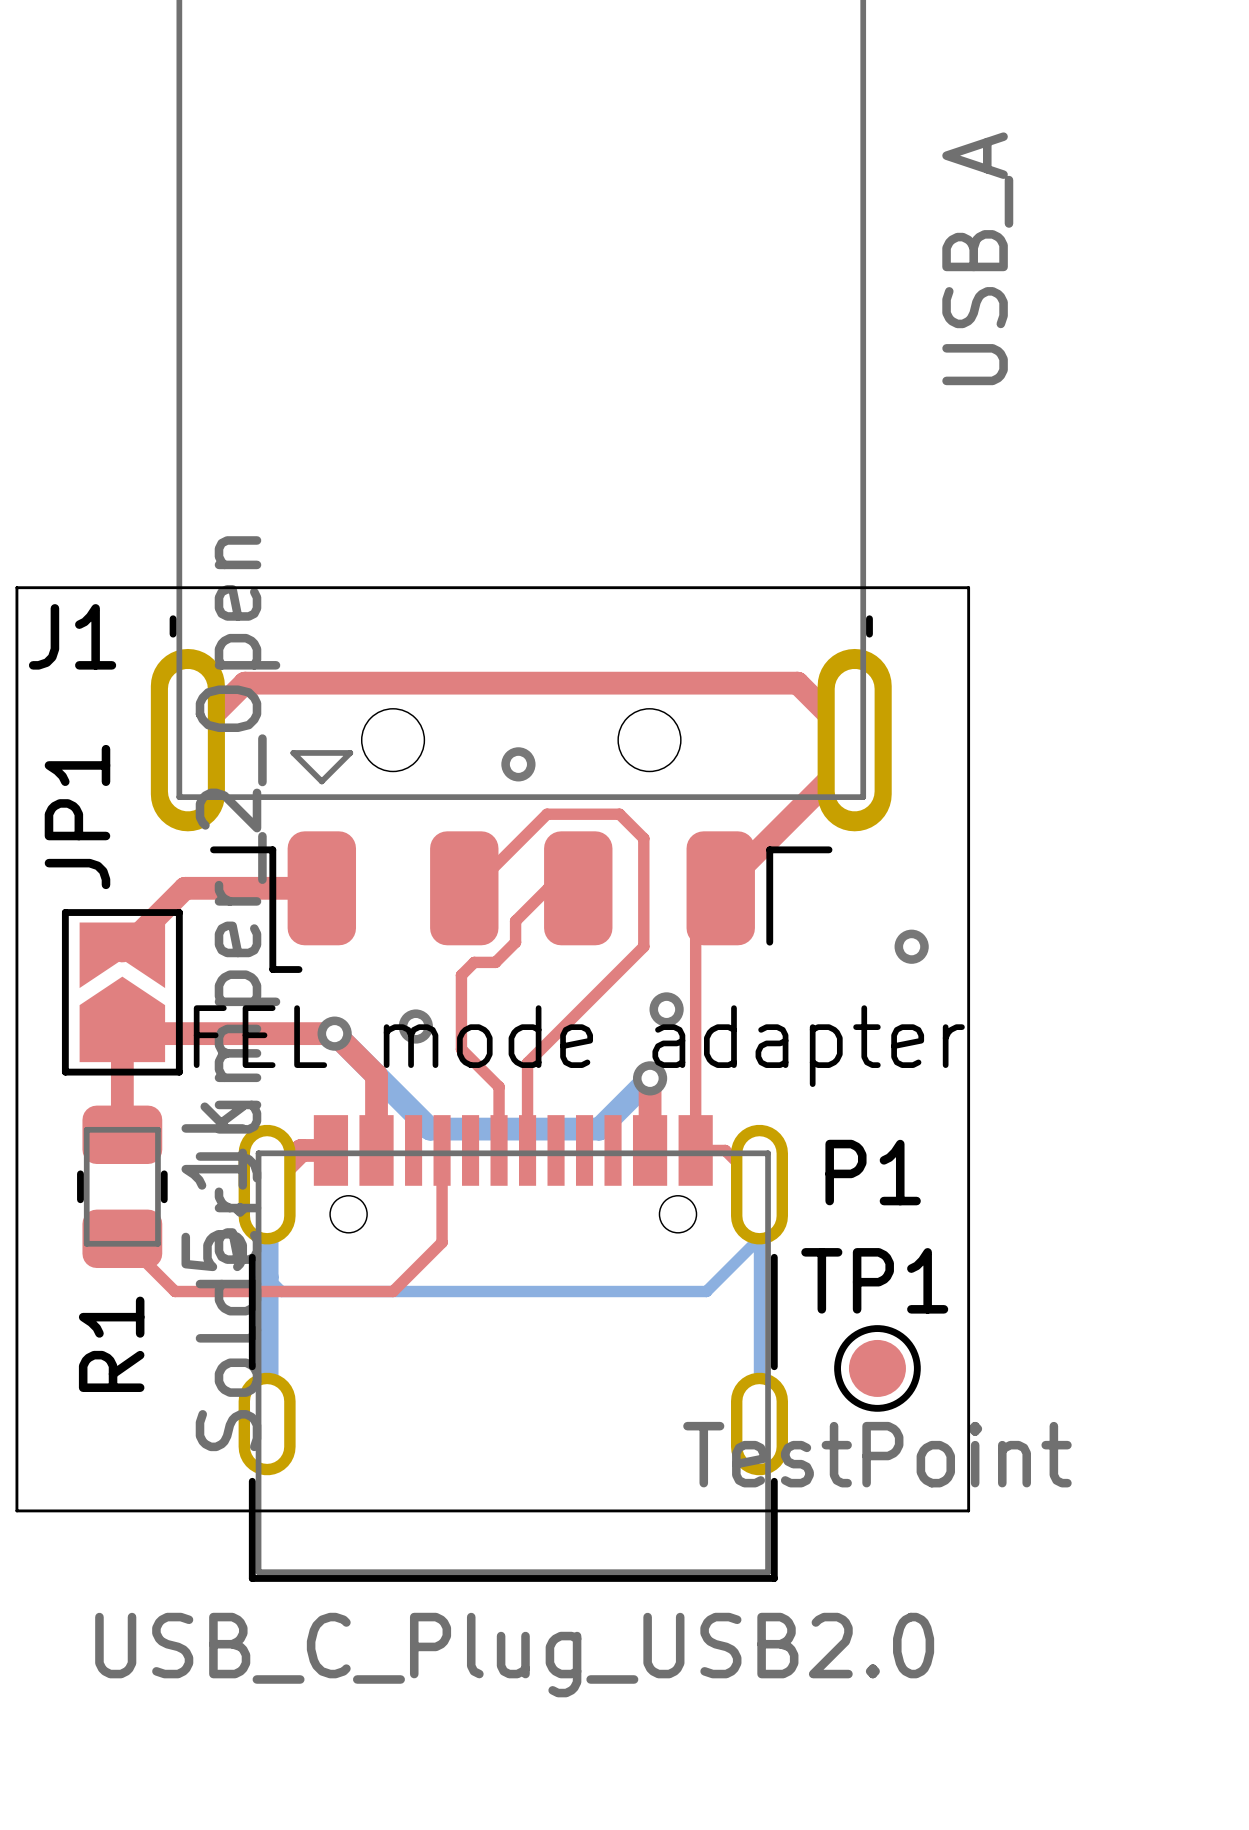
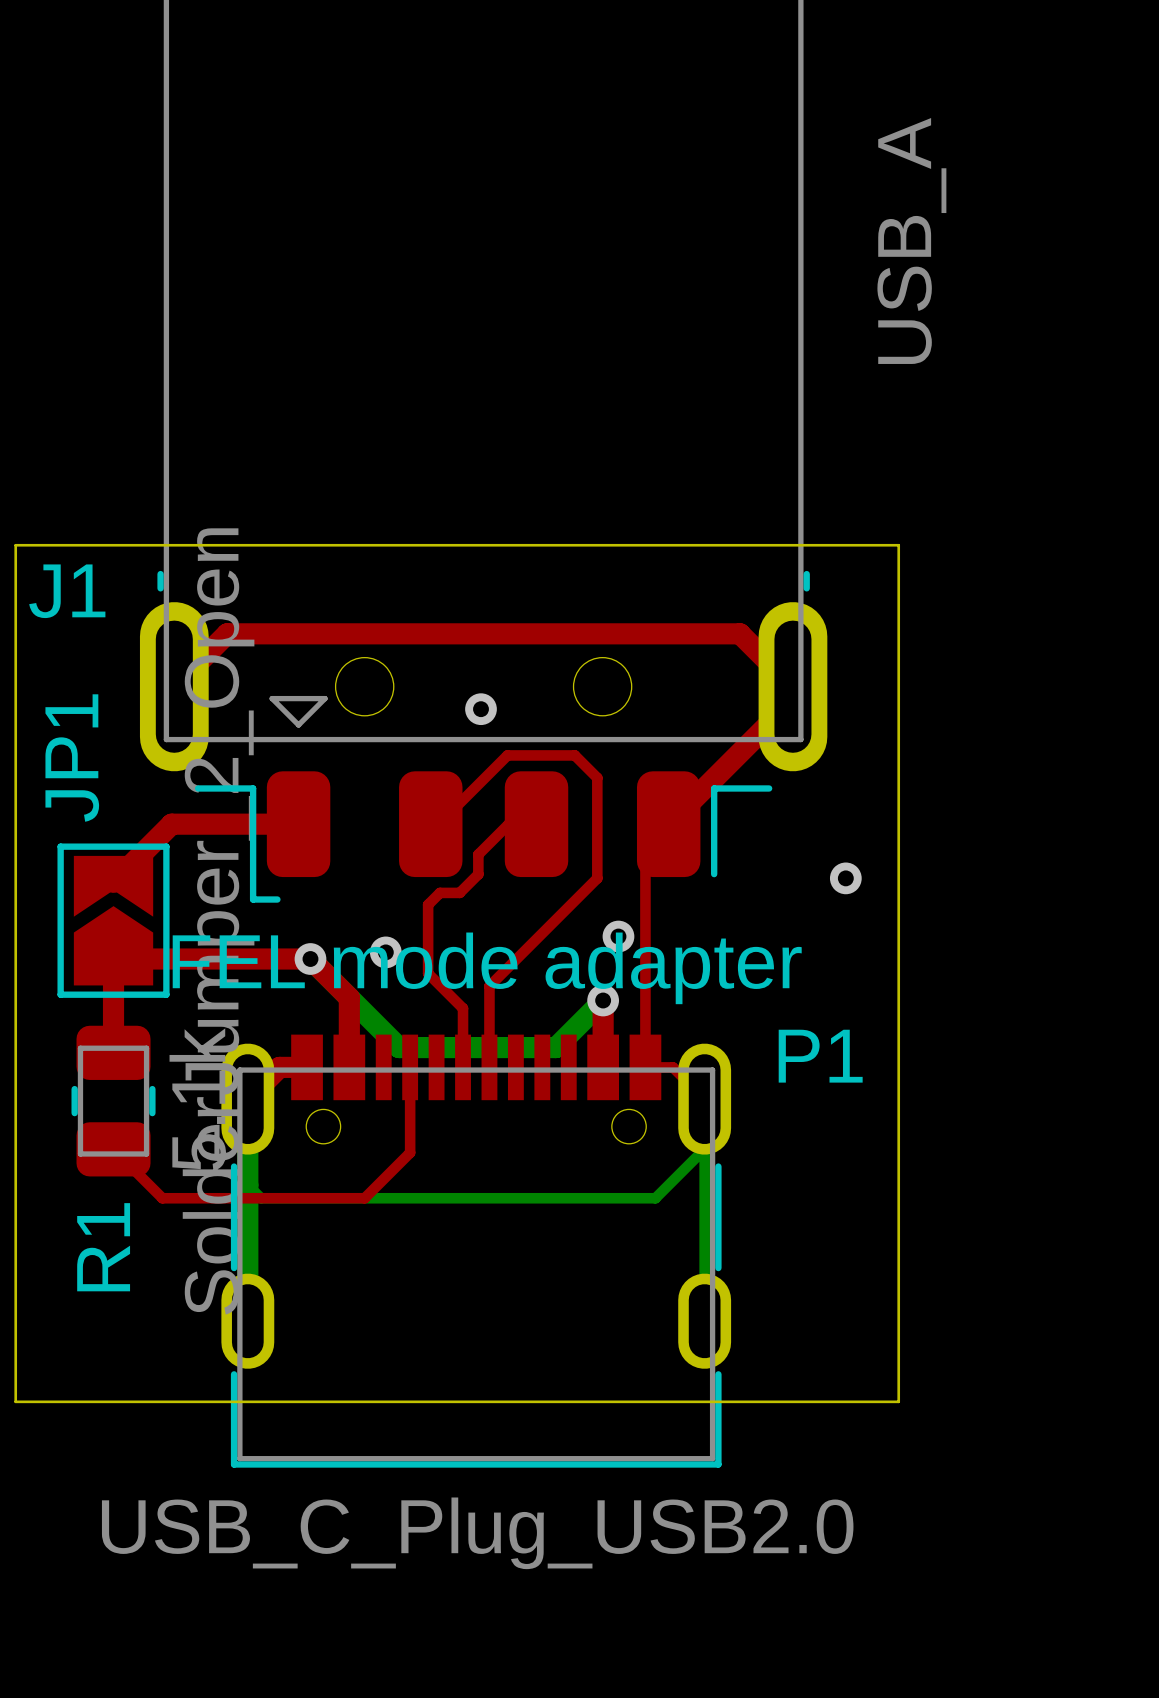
P1 name position: P1 (873, 1172) -> P1 (820, 1056)
TP1: TestPoint (877, 1368) -> none

